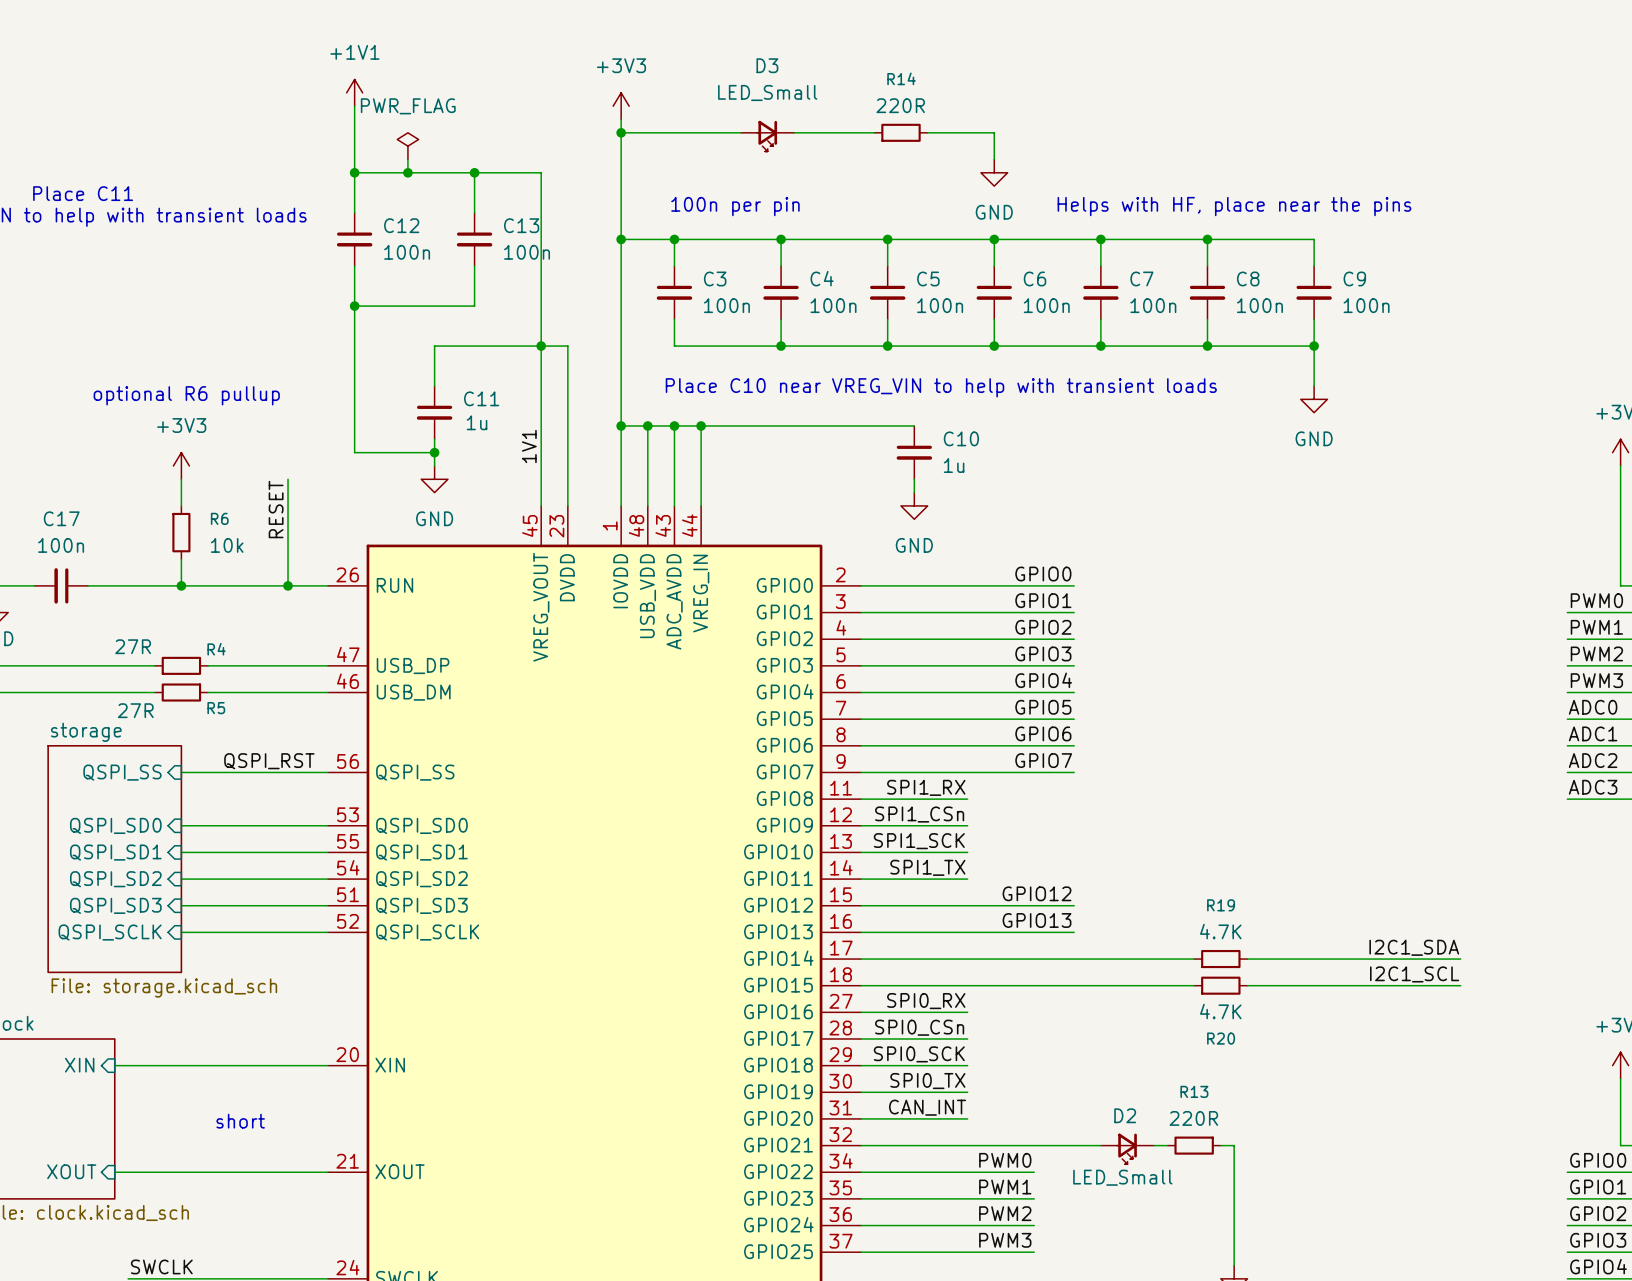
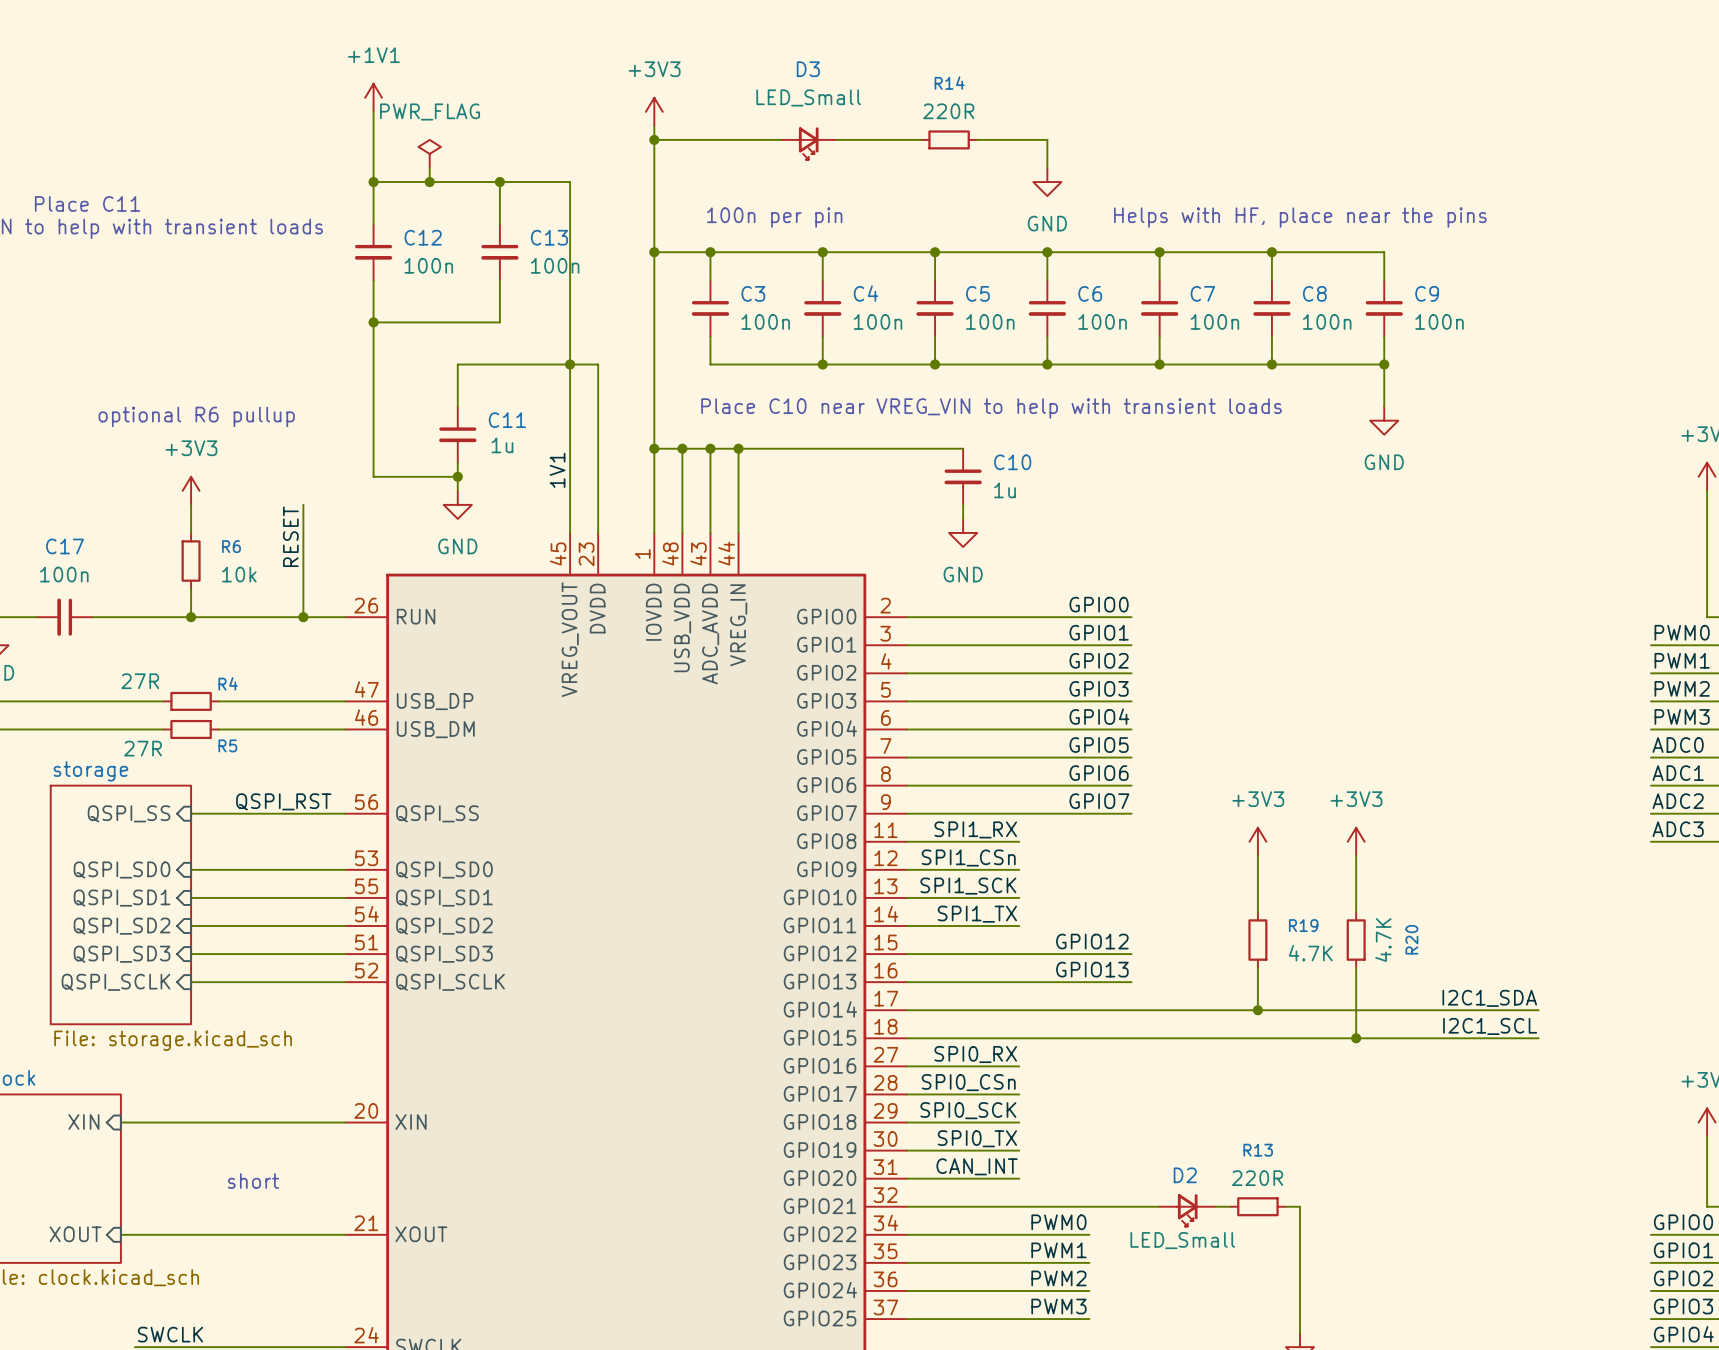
power symbol: none -> +3V3 (1257, 841)
power symbol: none -> +3V3 (1356, 841)
wire: none -> (1257, 855) (1257, 911)
wire: none -> (1356, 855) (1356, 911)
wire: none -> (1257, 968) (1257, 1010) (1314, 1010)
wire: none -> (1356, 968) (1356, 1038)
R19 value position: 4.7K (1220, 931) -> 4.7K (1310, 953)
junction: none -> (1257, 1010)
R19 rotation: 0° (1220, 959) -> 90° clockwise (1257, 940)
R19 position: (1220, 959) -> (1257, 940)
wire: none -> (1257, 1038) (1314, 1038)
R20 rotation: 0° (1220, 985) -> 90° clockwise (1356, 940)
R20 position: (1220, 985) -> (1356, 940)
junction: none -> (1356, 1038)
R20 value position: 4.7K (1220, 1011) -> 4.7K (1383, 940)
R20 name position: R20 (1221, 1038) -> R20 (1411, 939)

